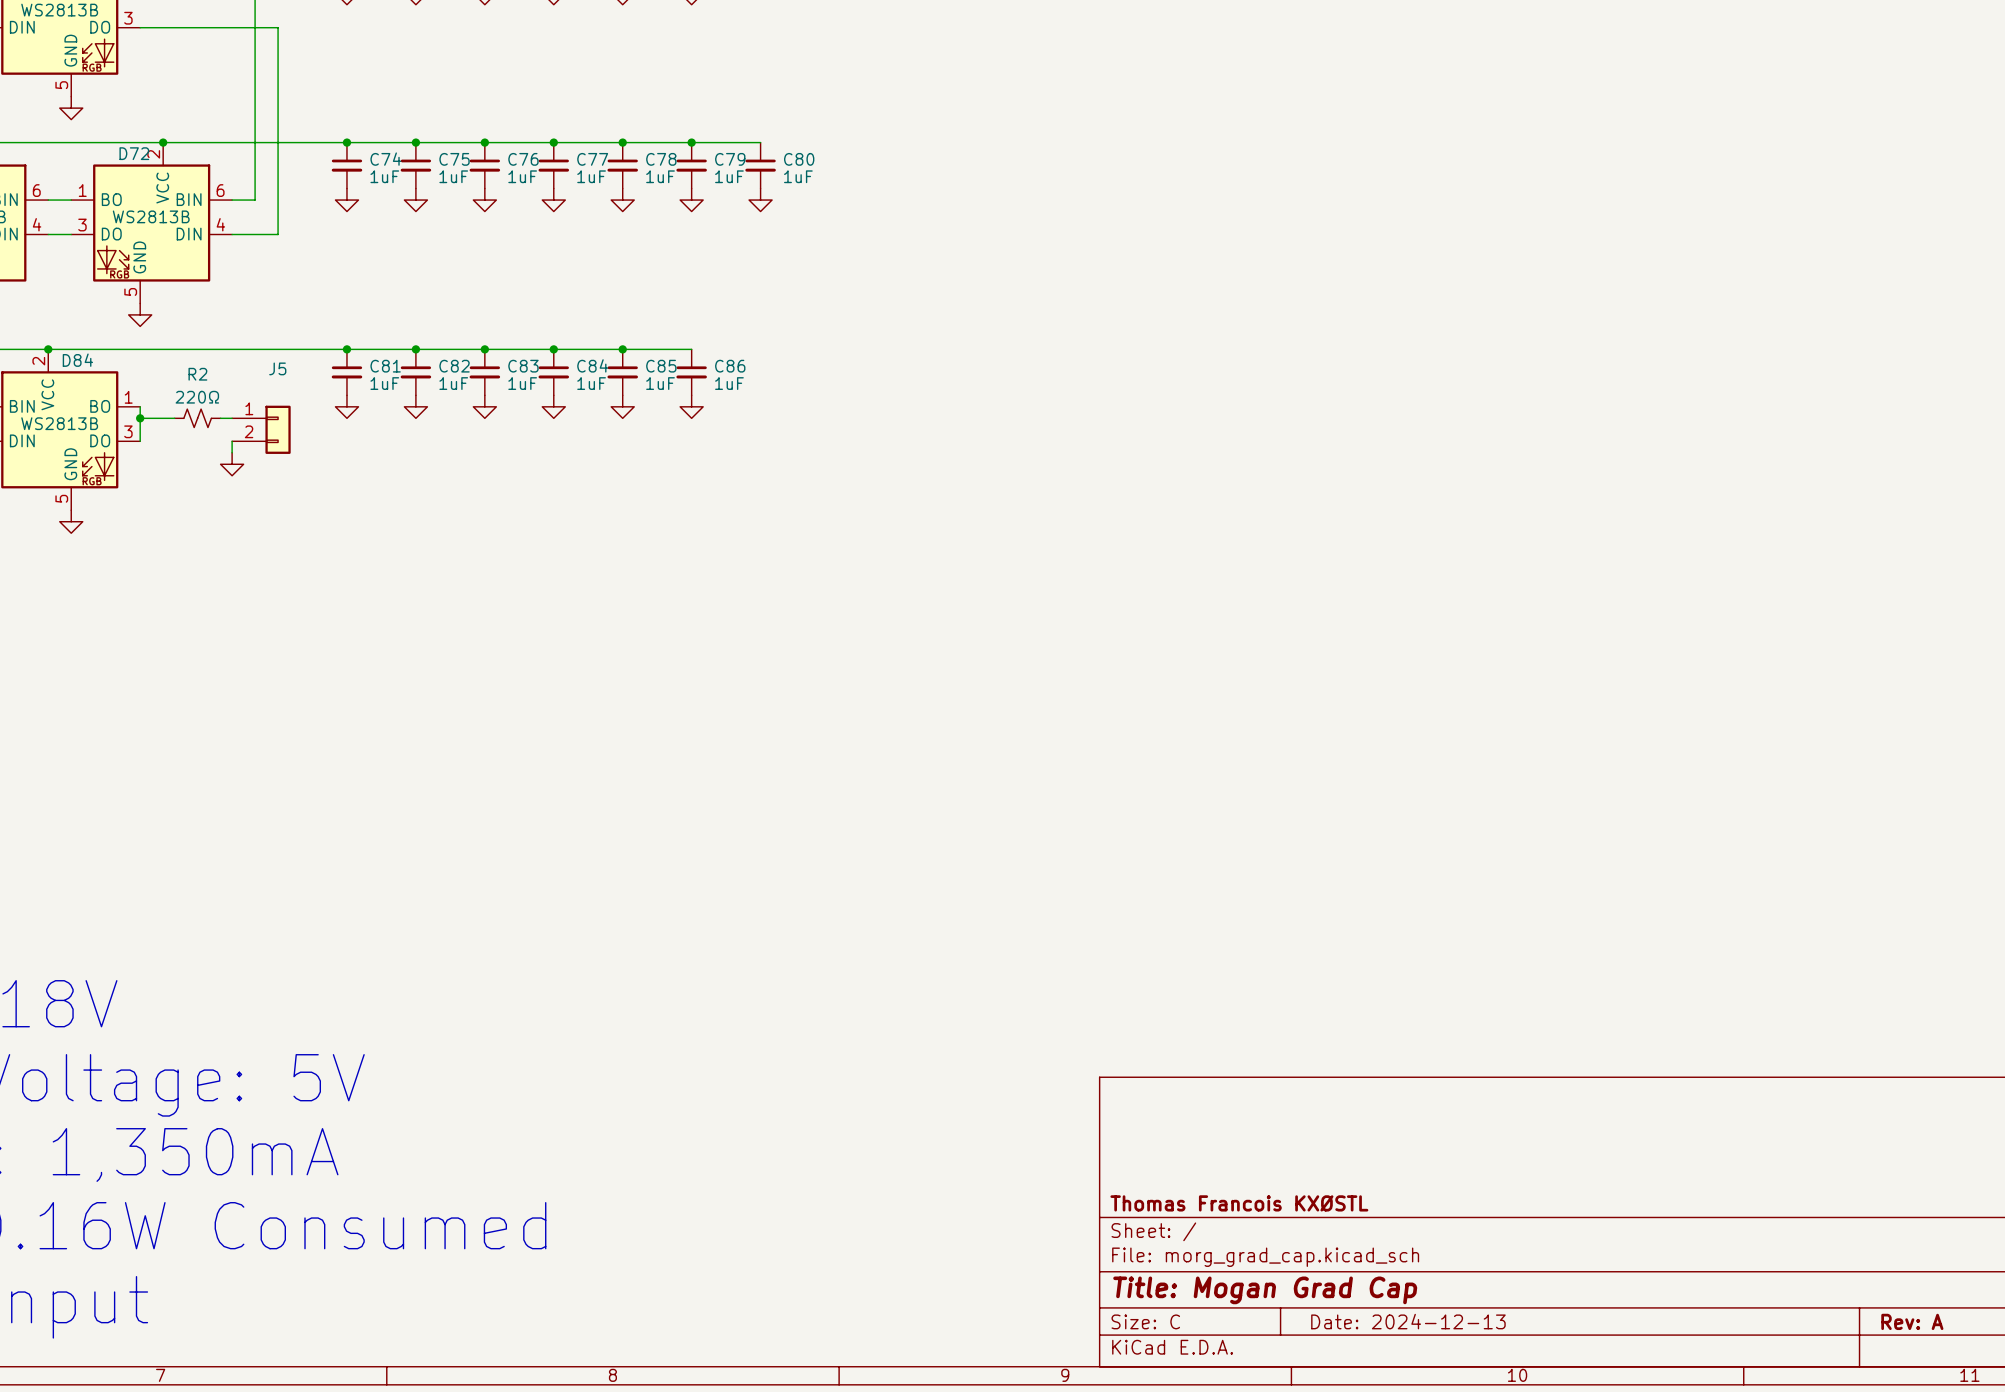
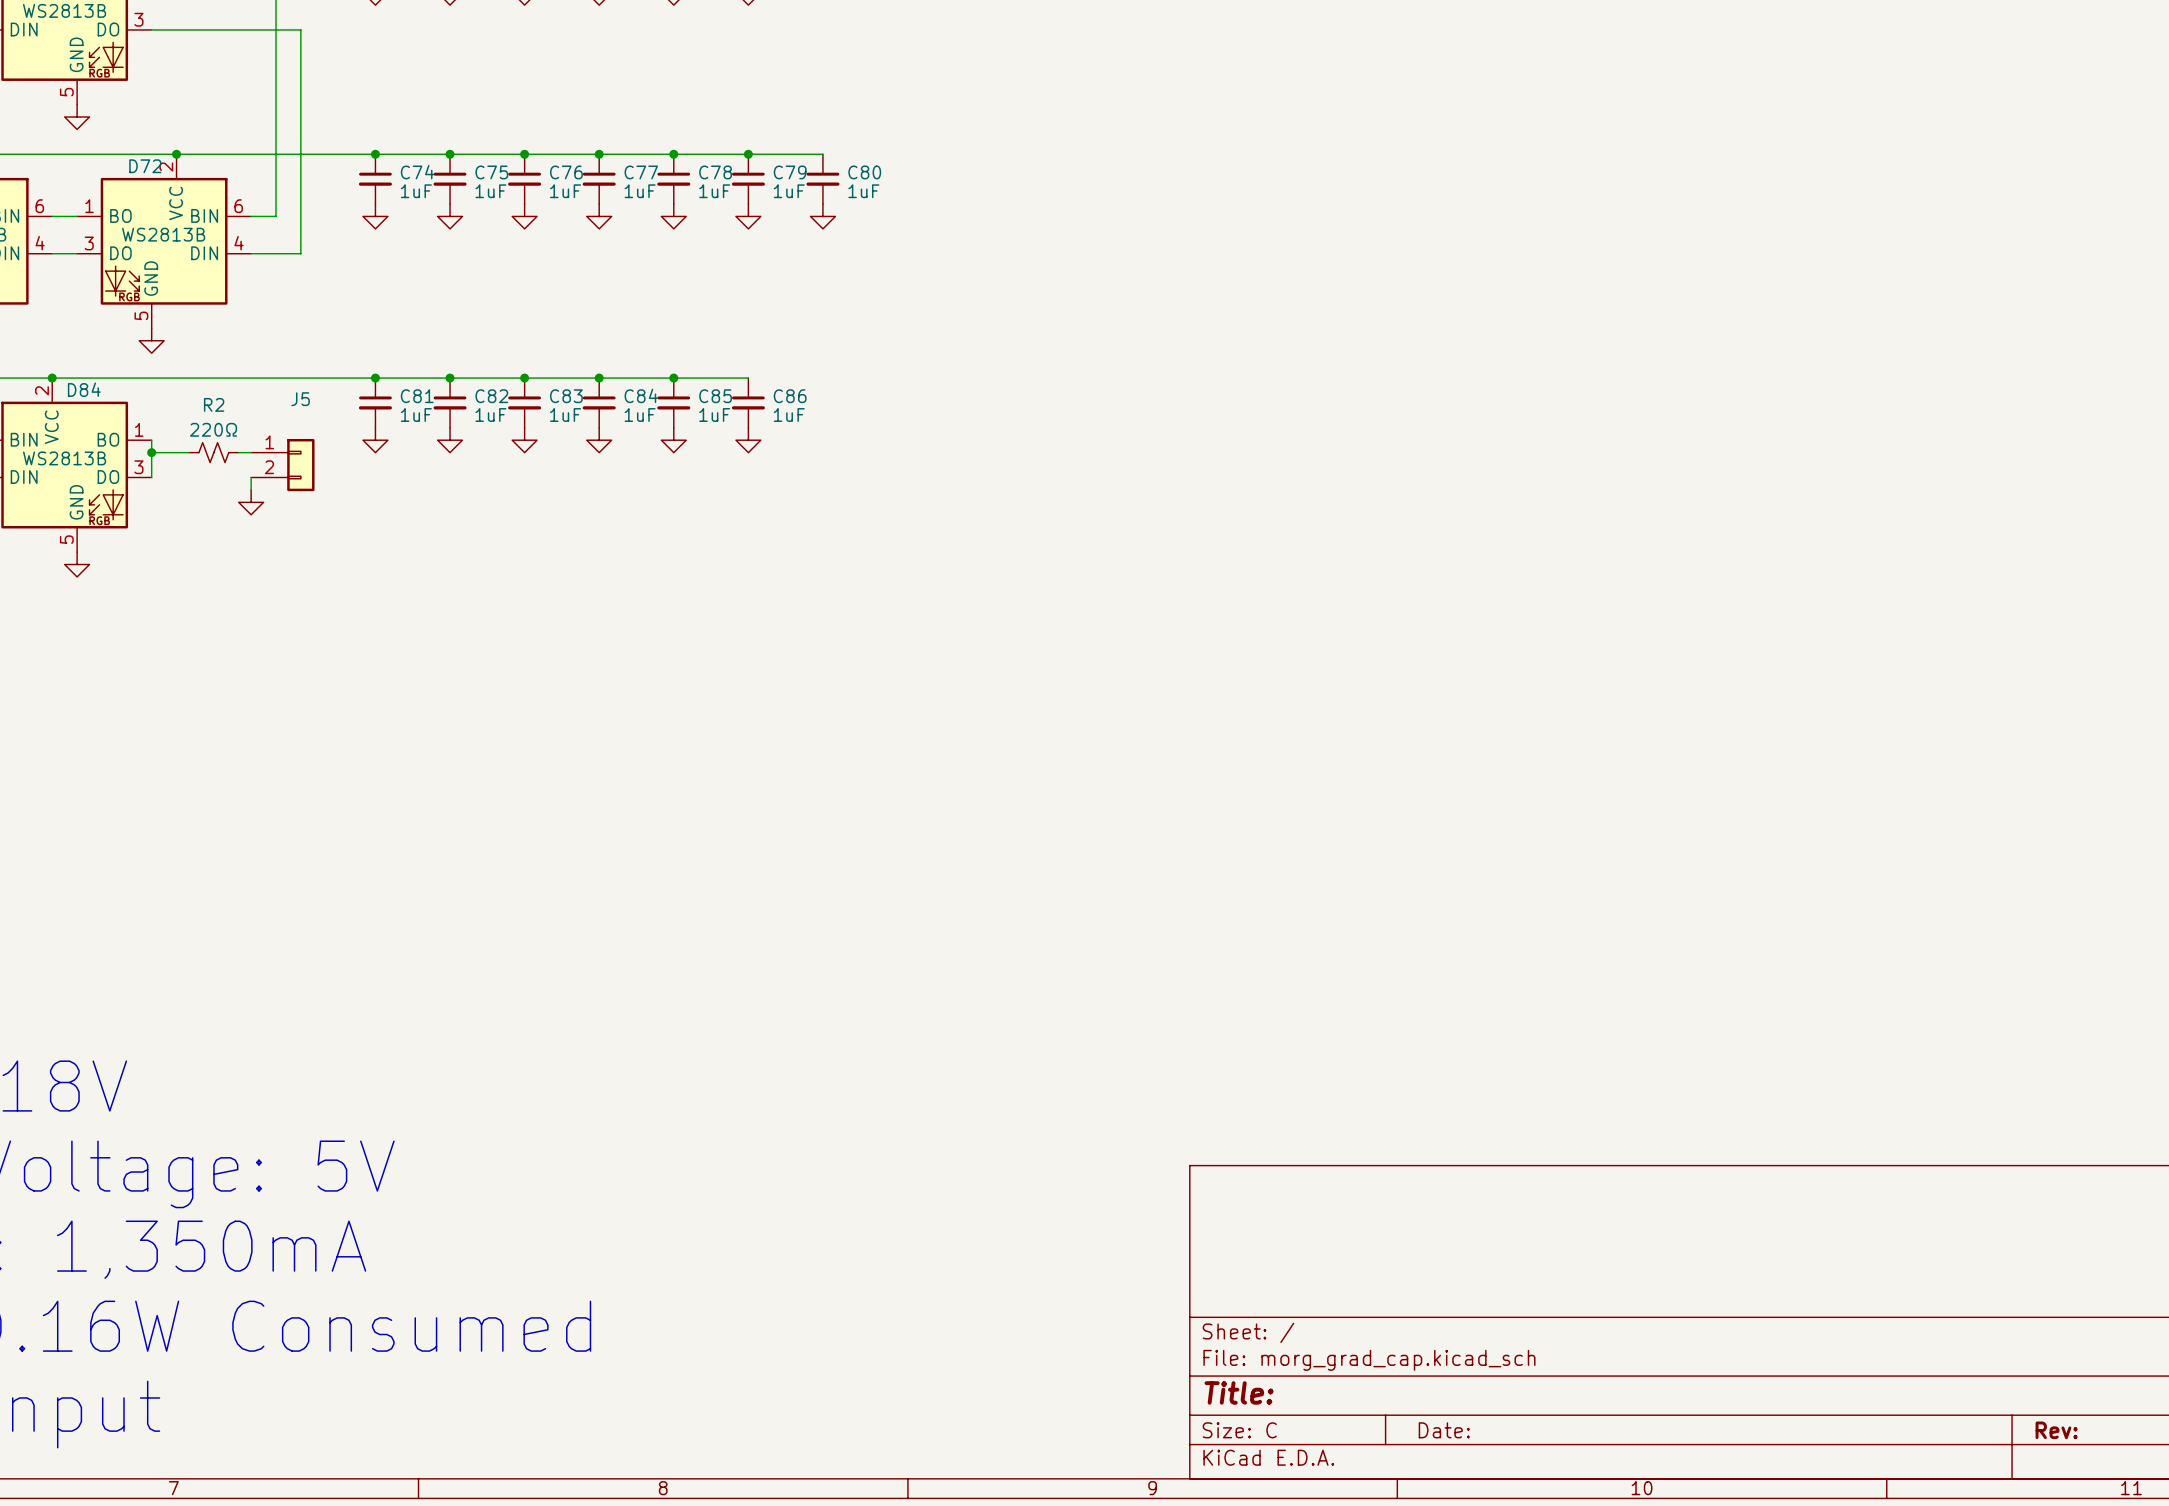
title block: Thomas Francois KXØSTL (1239, 1203) -> none
title block: Title: Mogan Grad Cap (1265, 1290) -> Title: (1239, 1392)
title block: Date: 2024-12-13 (1408, 1321) -> Date: (1444, 1430)
title block: Rev: A (1912, 1321) -> Rev: (2056, 1430)

